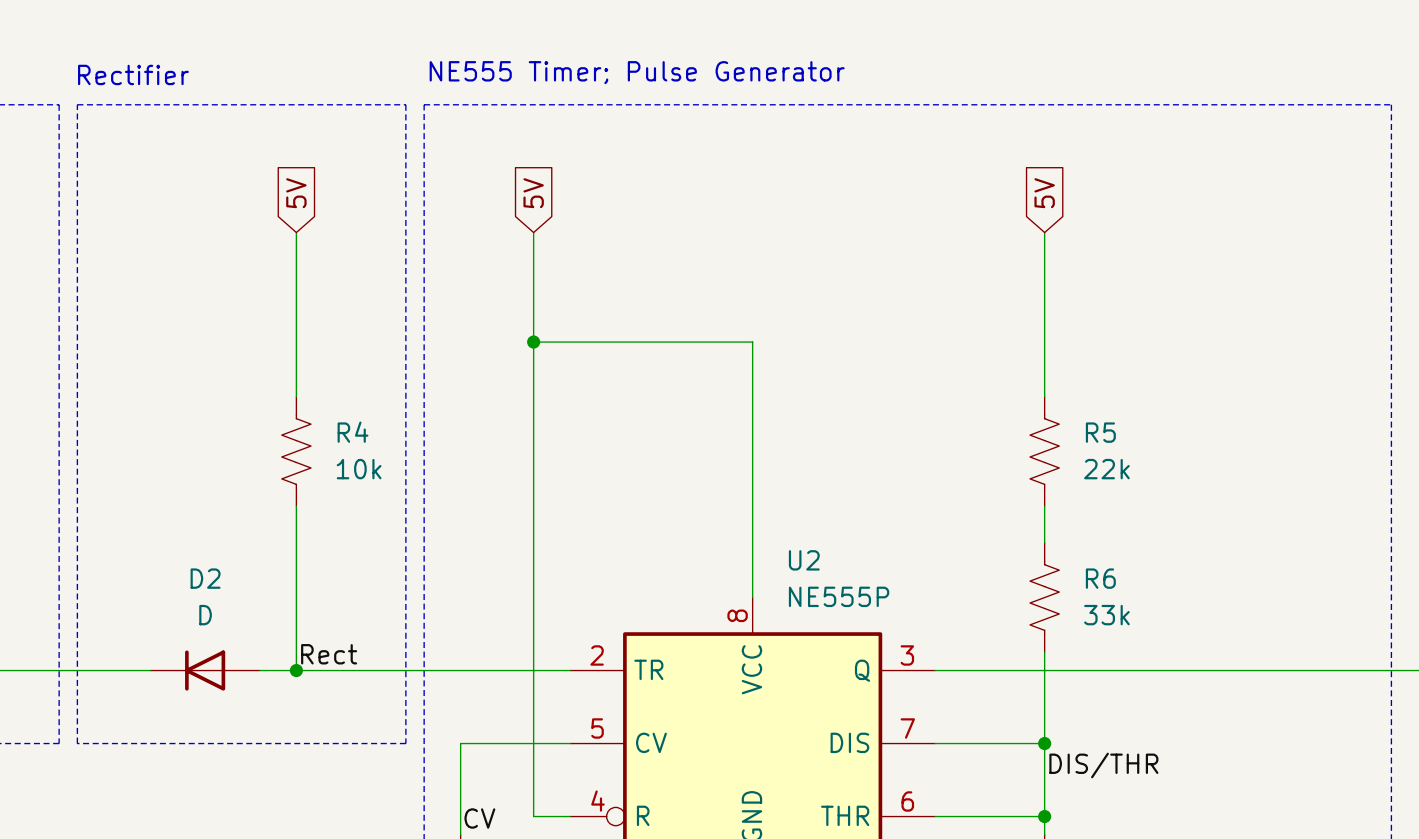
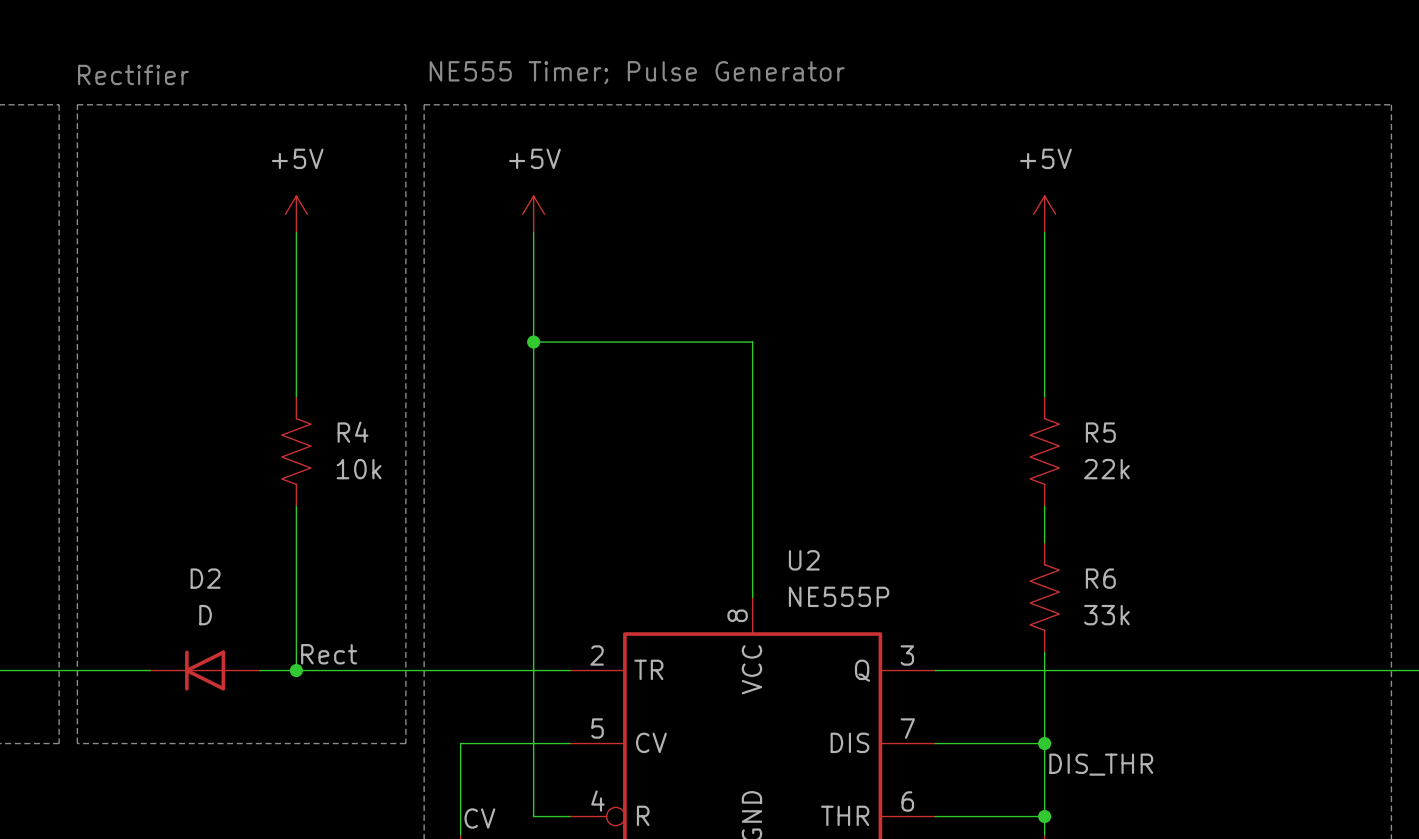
global label: 5V (296, 193) -> none
global label: 5V (533, 193) -> none
global label: 5V (1044, 193) -> none
power symbol: none -> +5V (296, 214)
power symbol: none -> +5V (533, 214)
power symbol: none -> +5V (1044, 214)
label: DIS/THR (1103, 765) -> DIS_THR (1101, 764)

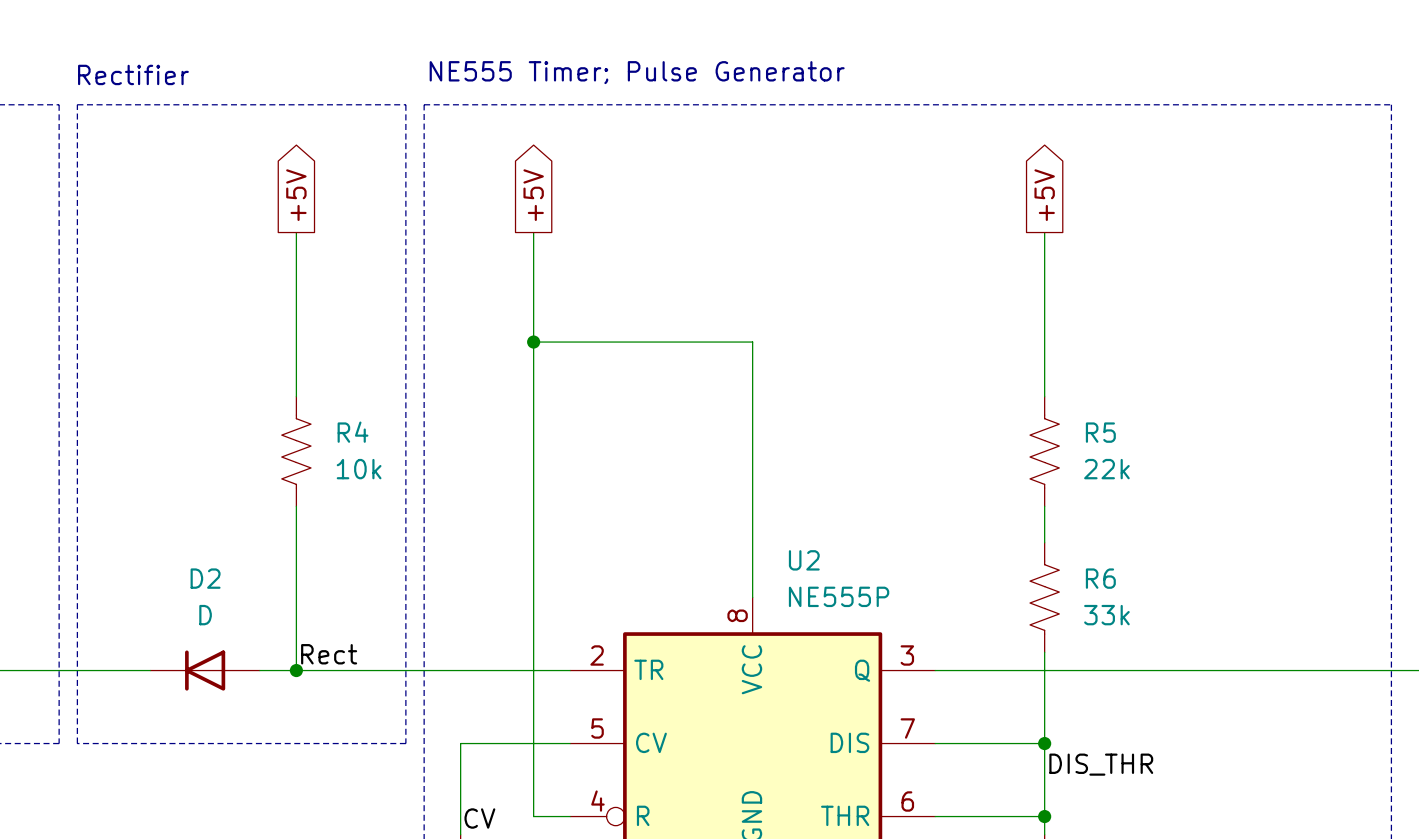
global label: none -> +5V (296, 195)
global label: none -> +5V (533, 195)
global label: none -> +5V (1044, 195)
power symbol: +5V (296, 214) -> none
power symbol: +5V (533, 214) -> none
power symbol: +5V (1044, 214) -> none

